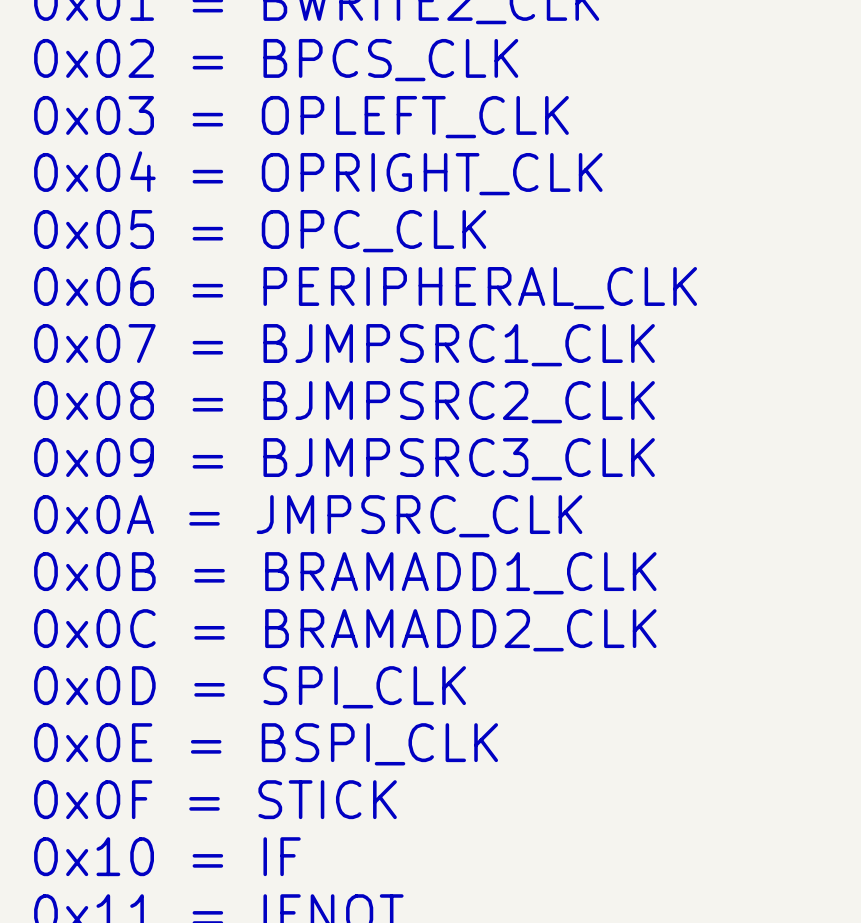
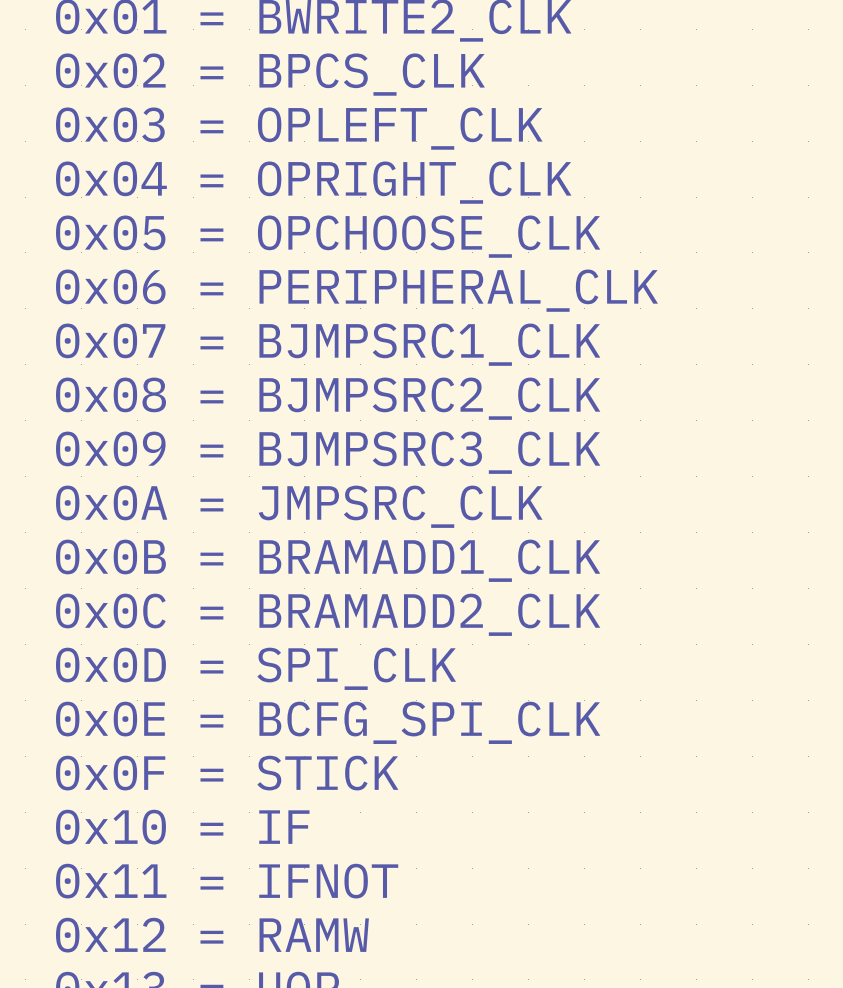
text: 0x05 = OPC_CLK (260, 231) -> 0x05 = OPCHOOSE_CLK (328, 236)
text: 0x0E = BSPI_CLK (266, 744) -> 0x0E = BCFG_SPI_CLK (328, 722)

